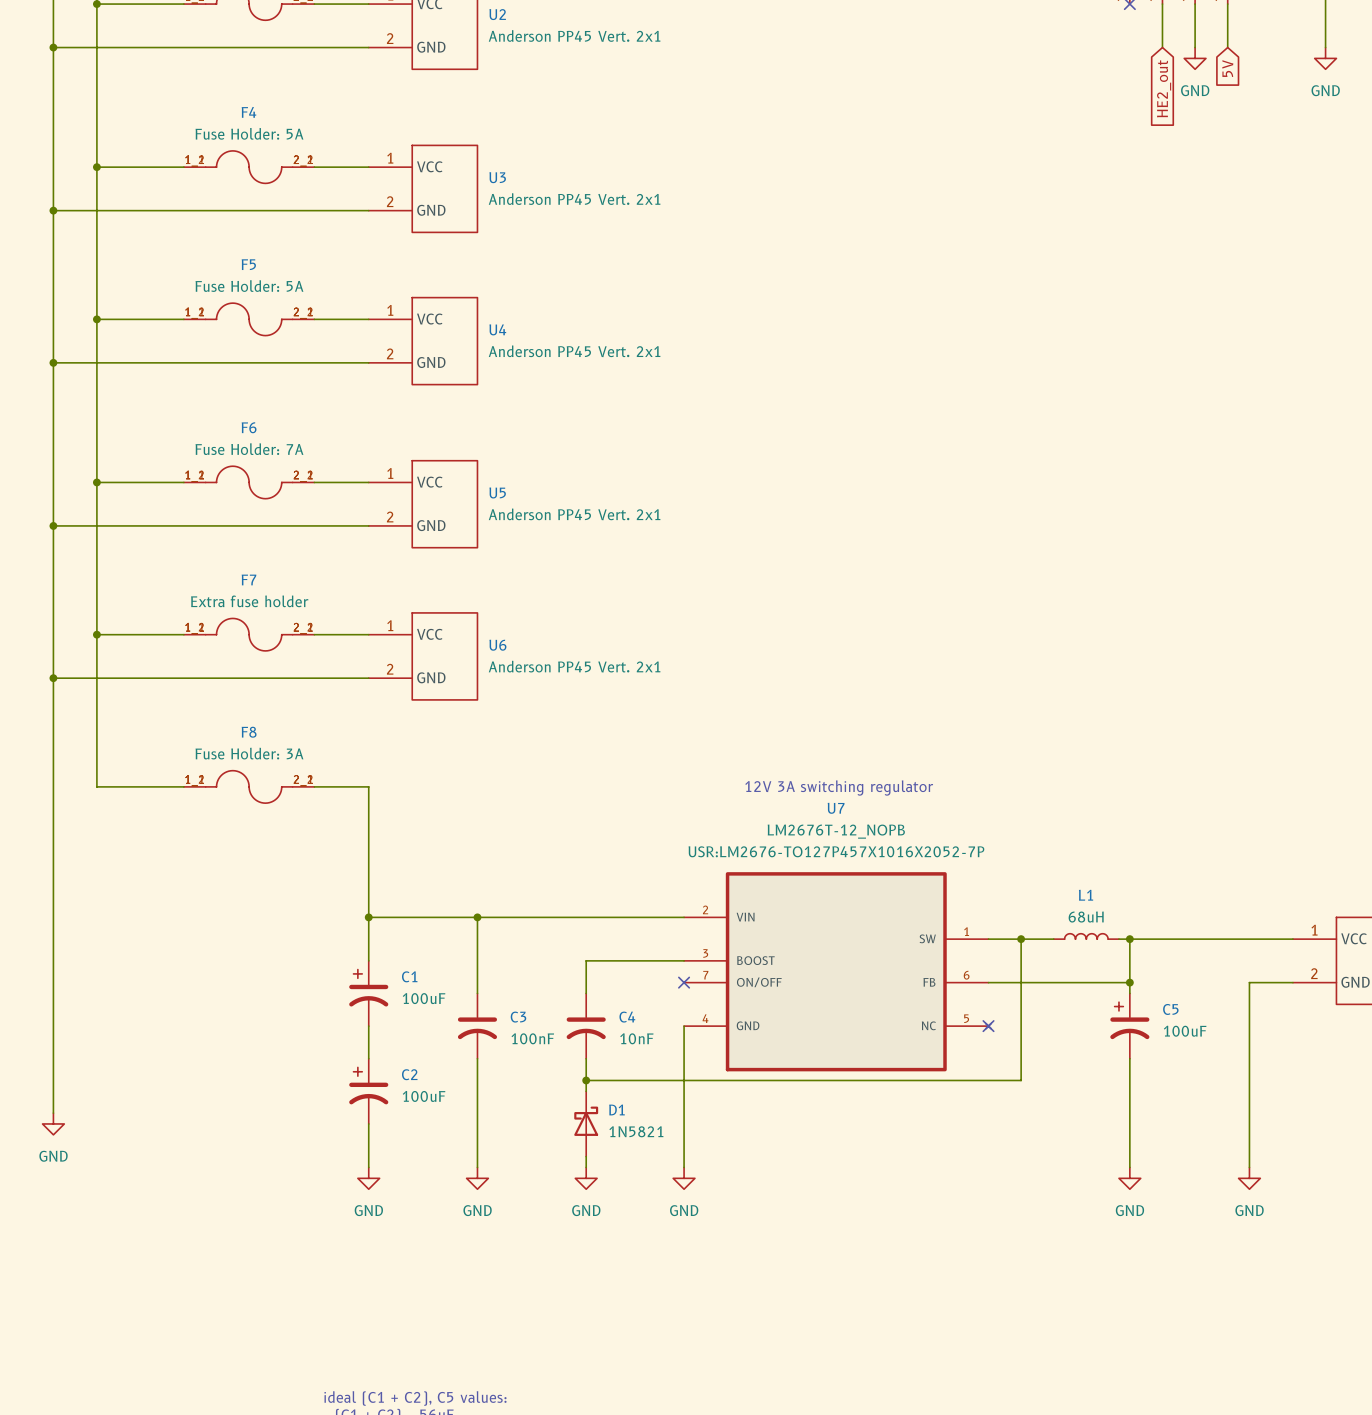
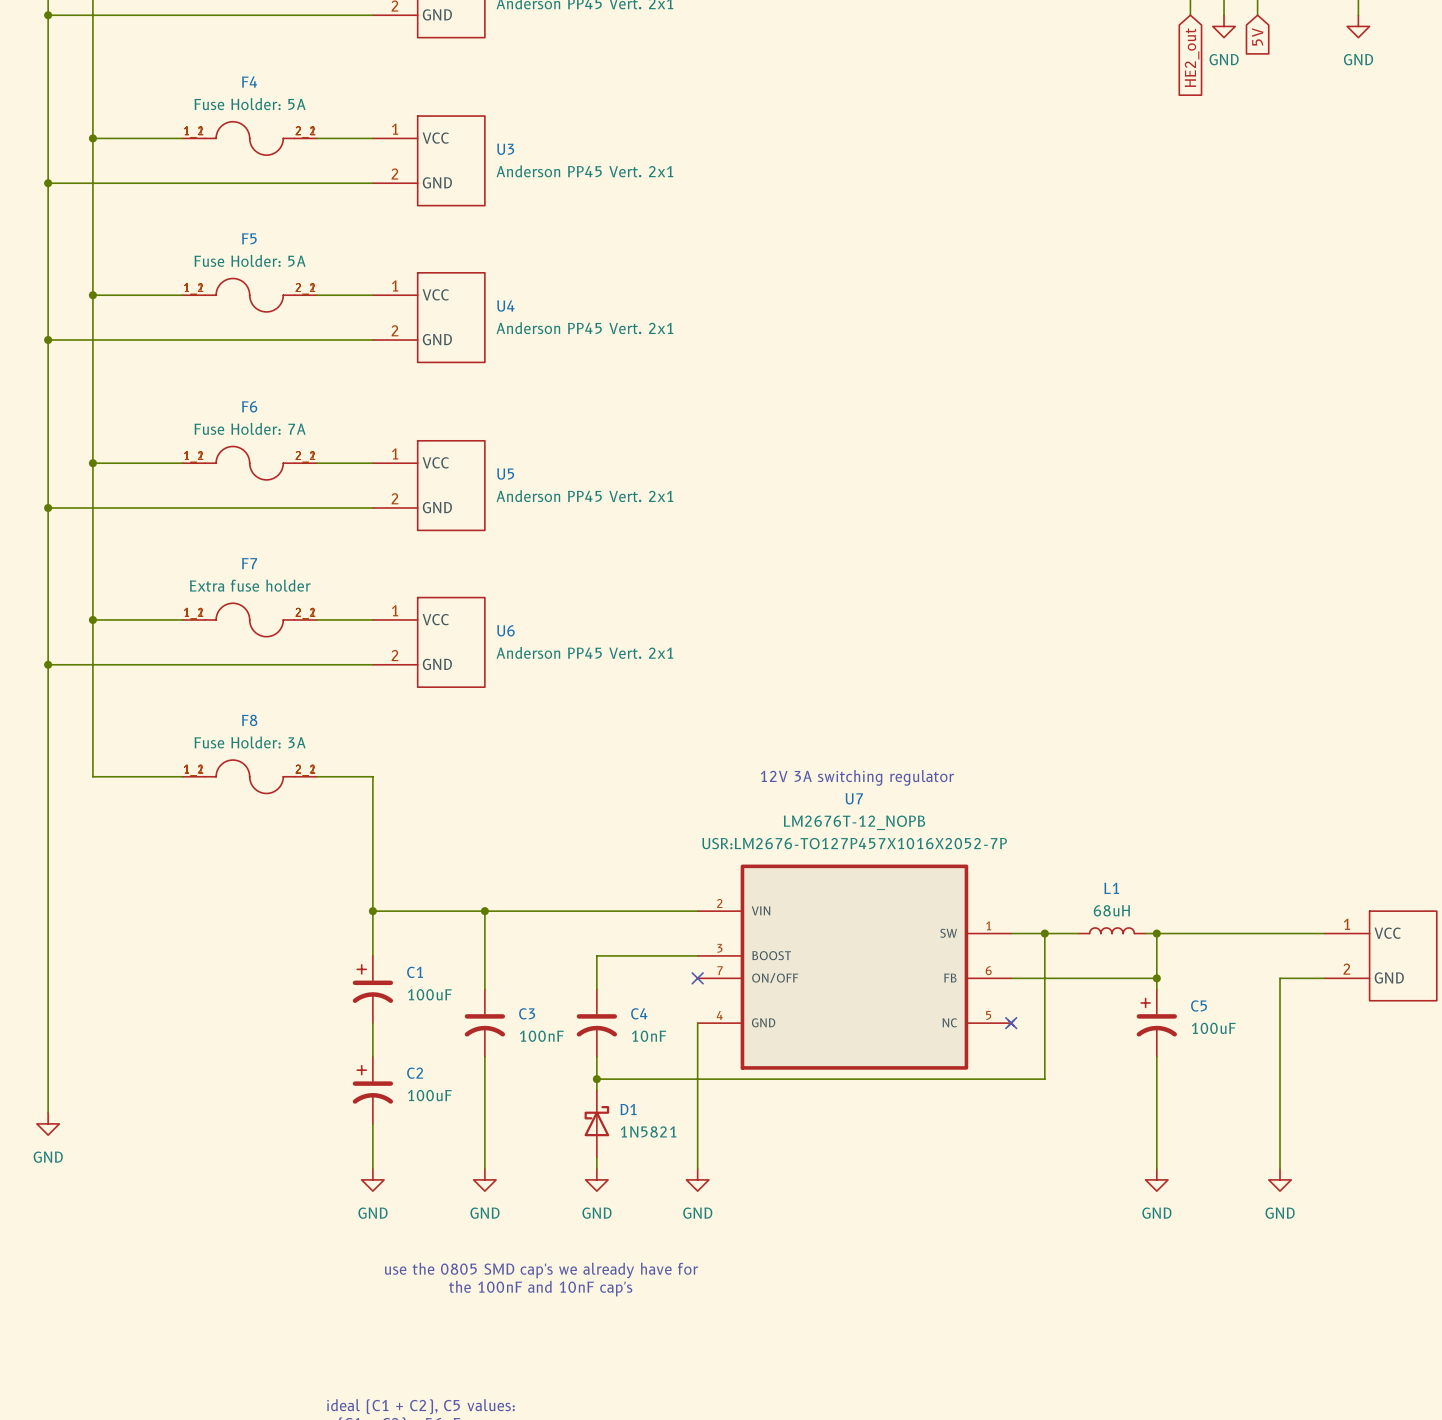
text: none -> use the 0805 SMD cap's we already have for (541, 1270)
text: none -> the 100nF and 10nF cap's (540, 1288)

